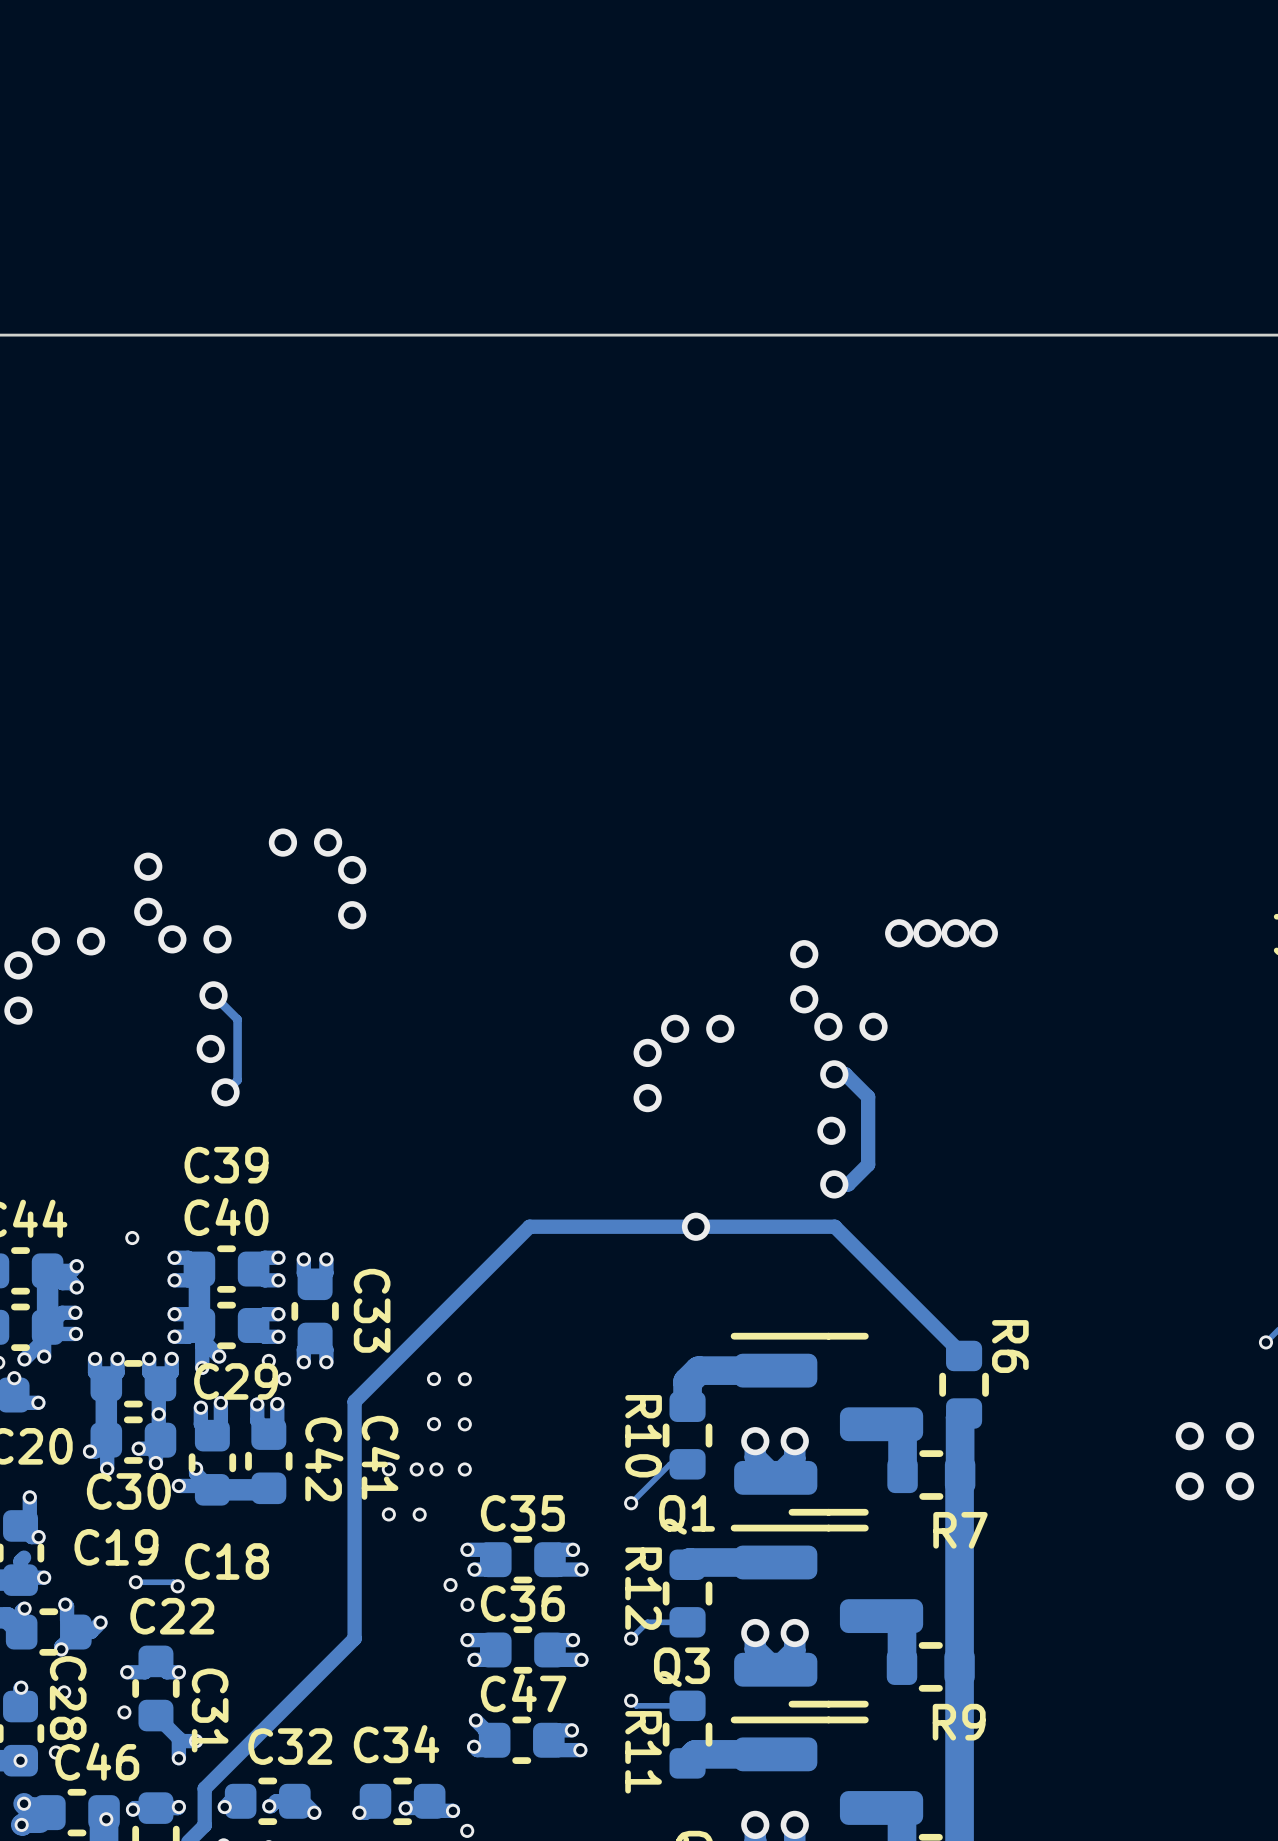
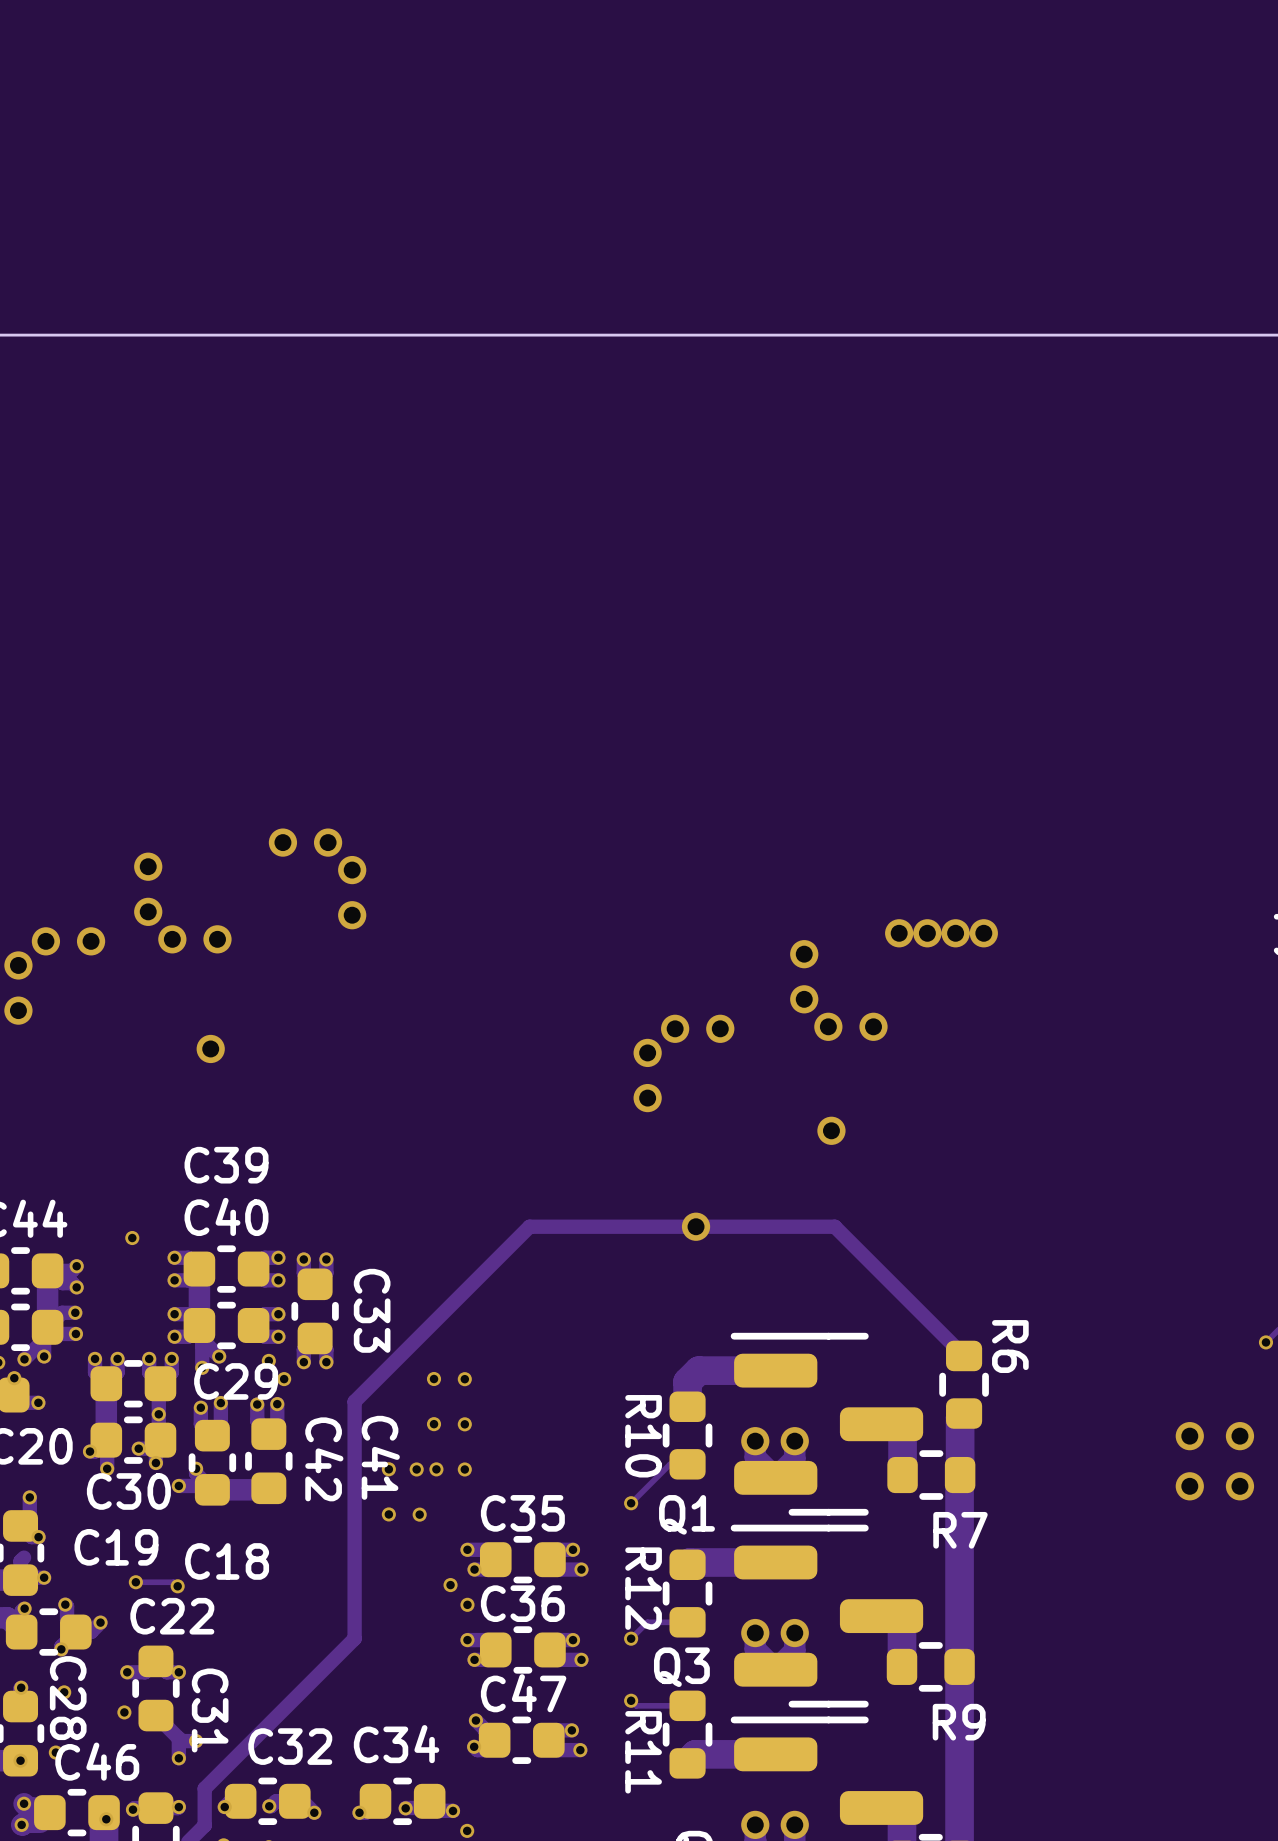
track: (213, 995) (237, 1019) (237, 1080) (225, 1092) -> none
via: (213, 995) -> none
track: (834, 1074) (845, 1074) (868, 1096) (868, 1164) (848, 1184) (834, 1184) -> none
via: (834, 1074) -> none
via: (225, 1092) -> none
via: (834, 1184) -> none

